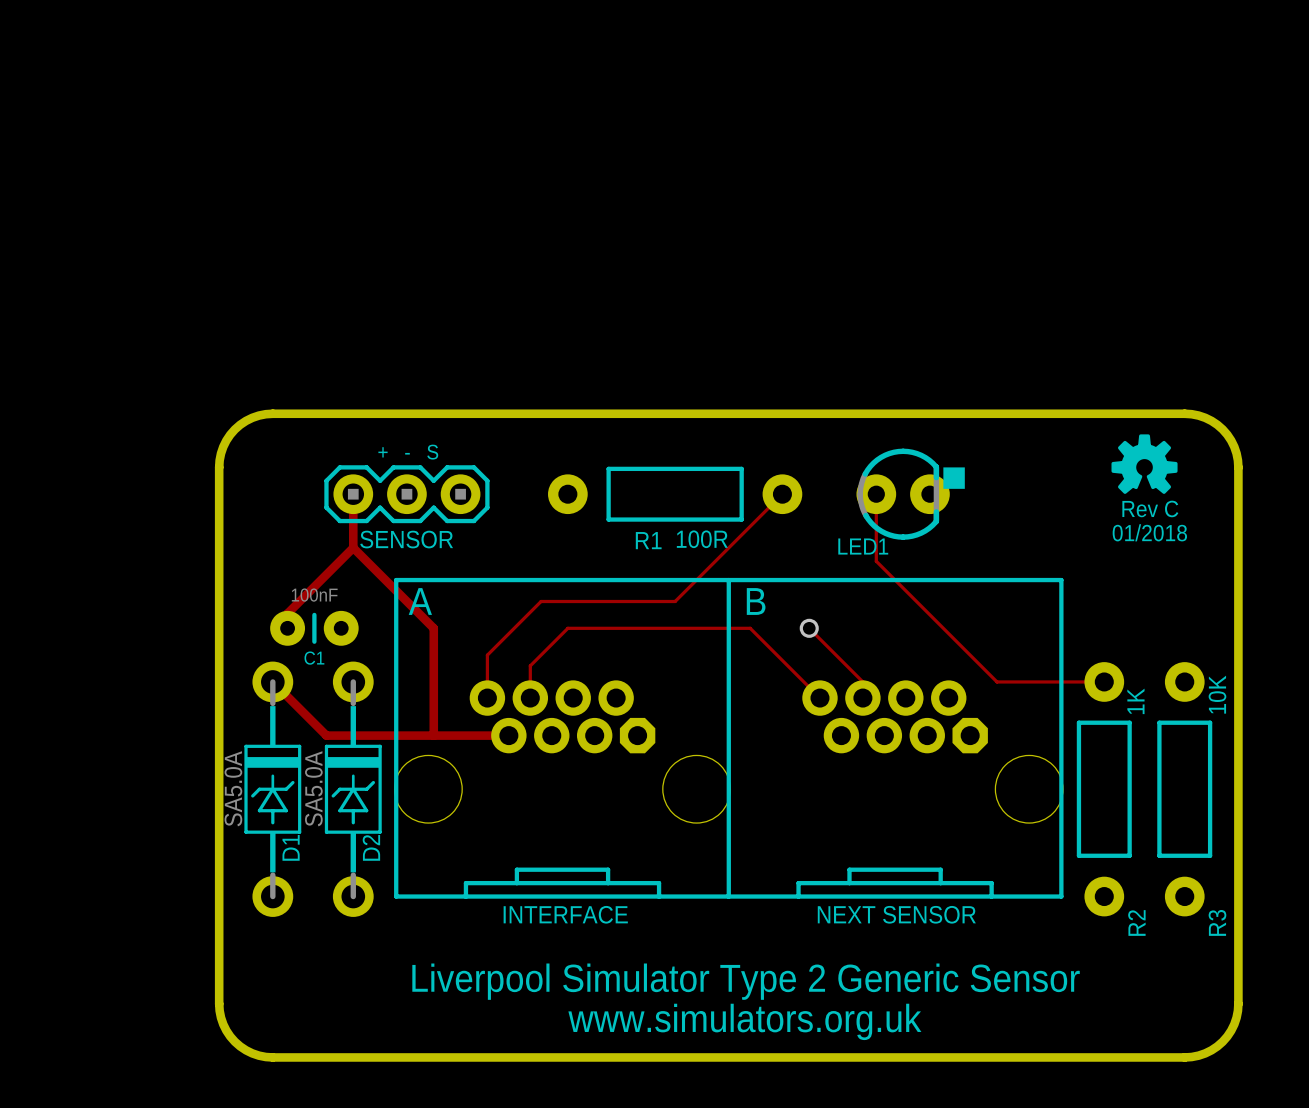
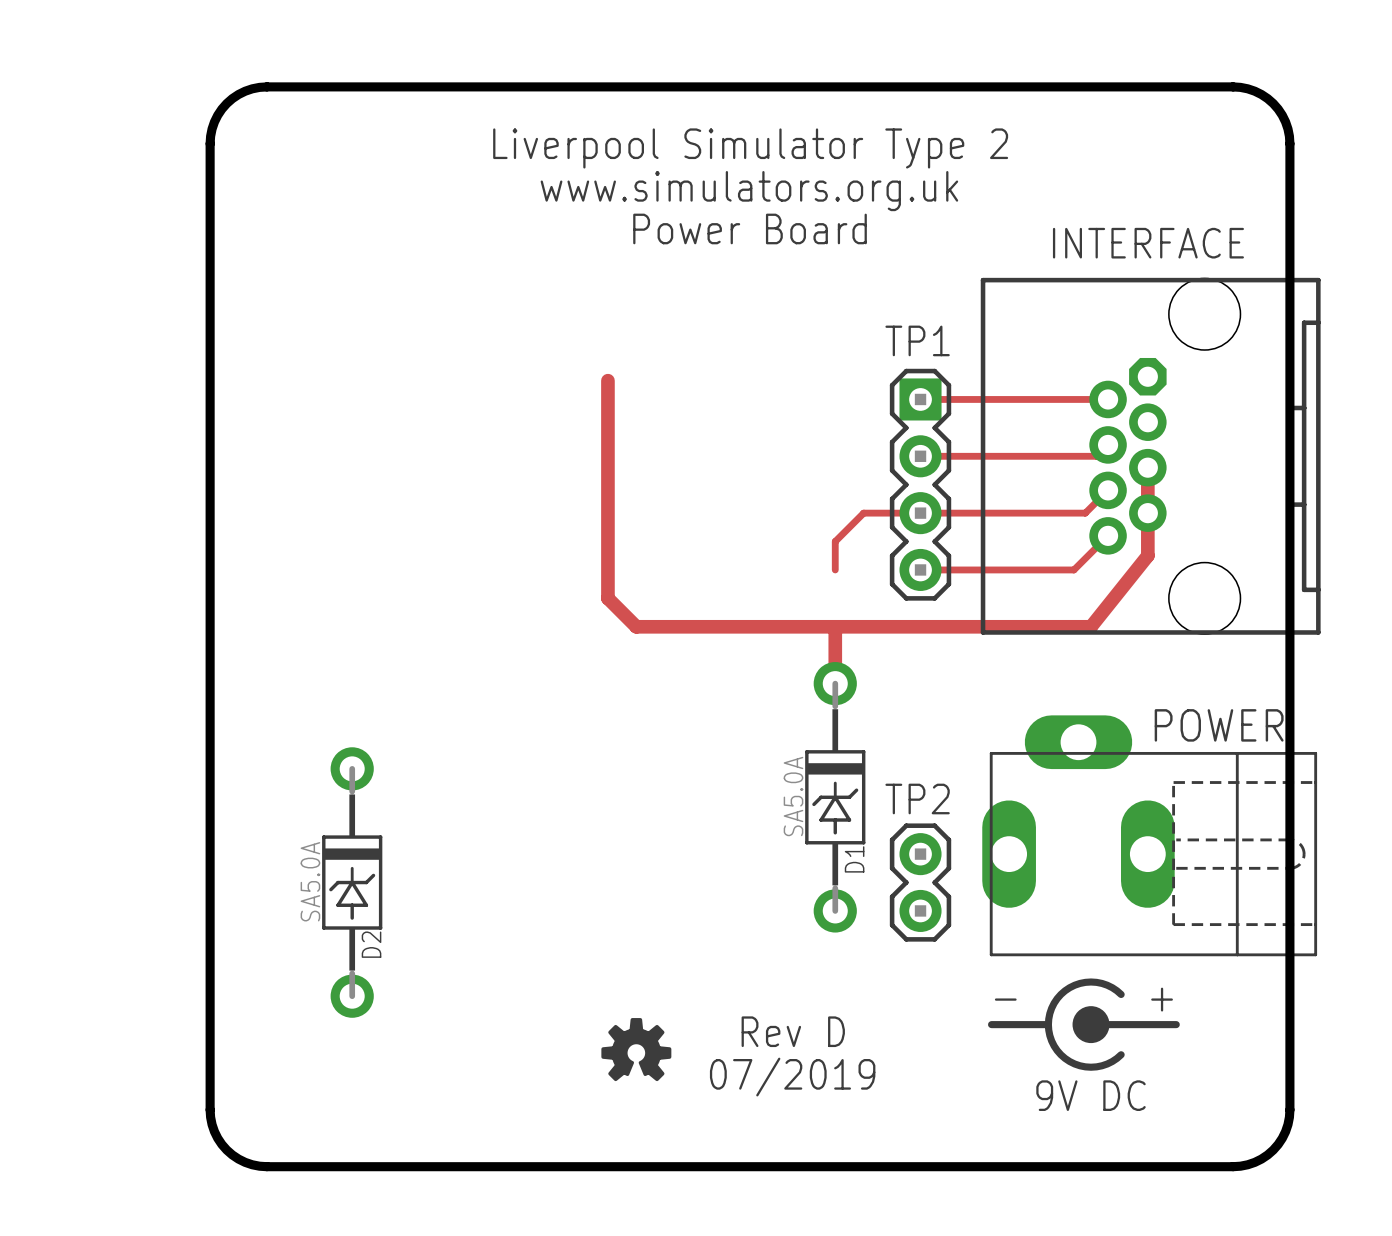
text: none -> Liverpool Simulator Type 2 (750, 148)
text: none -> www.simulators.org.uk (749, 191)
text: none -> Power Board (750, 228)
track: none -> (607, 380) (607, 598) (636, 626) (1091, 626) (1147, 555) (1147, 467)
track: none -> (920, 399) (1108, 399)
track: none -> (1108, 444) (1096, 456) (920, 456)
INTERFACE: none -> (1150, 456)
TP1: none -> (920, 484)
track: none -> (1108, 490) (1085, 513) (863, 513) (835, 541) (835, 569)
drawing: [1111, 434, 1178, 494] -> none
text: + - S (408, 452) -> none
track: none -> (1108, 535) (1073, 569) (920, 569)
board edge: (219, 467) (223, 446) (234, 429) (252, 417) (272, 413) (1184, 413) (1205, 417) (1222, 429) (1234, 446) (1238, 467) -> (210, 541) (210, 136) (214, 121) (226, 103) (245, 91) (266, 86) (1233, 86) (1254, 91) (1267, 98) (1278, 109) (1285, 121) (1289, 136) (1289, 541)
drawing: [943, 467, 965, 489] -> none
track: (353, 494) (353, 547) -> (835, 626) (835, 683)
SENSOR: (406, 494) -> none
R1: 100R (675, 494) -> none
track: (782, 494) (675, 601) (541, 601) (487, 655) (487, 698) -> none
track: (876, 494) (876, 561) (997, 681) (1104, 681) -> none
LED1: (903, 494) -> none
text: Rev C (1150, 508) -> none
text: 01/2018 (1149, 532) -> none
track: (353, 547) (433, 628) (433, 735) -> none
track: (353, 547) (287, 613) (287, 628) -> none
C1: 100nF (314, 628) -> none
track: (809, 628) (862, 681) (862, 698) -> none
via: (809, 628) -> none
track: (272, 681) (326, 735) (508, 735) -> none
track: (530, 698) (530, 665) (567, 628) (750, 628) (819, 698) -> none
part: (728, 738) -> none
POWER: none -> 9V DC (1149, 835)
D1 position: (272, 789) -> (835, 797)
TP2: none -> (920, 882)
R2: 1K (1104, 789) -> none
R3: 10K (1184, 789) -> none
drawing: none -> [988, 978, 1180, 1071]
text: INTERFACE (565, 914) -> none
text: NEXT SENSOR (896, 914) -> none
drawing: none -> [601, 1018, 672, 1082]
text: none -> Rev D (793, 1031)
text: none -> 07/2019 (792, 1077)
text: Liverpool Simulator Type 2 Generic Sensor (746, 981) -> none
text: www.simulators.org.uk (744, 1021) -> none

